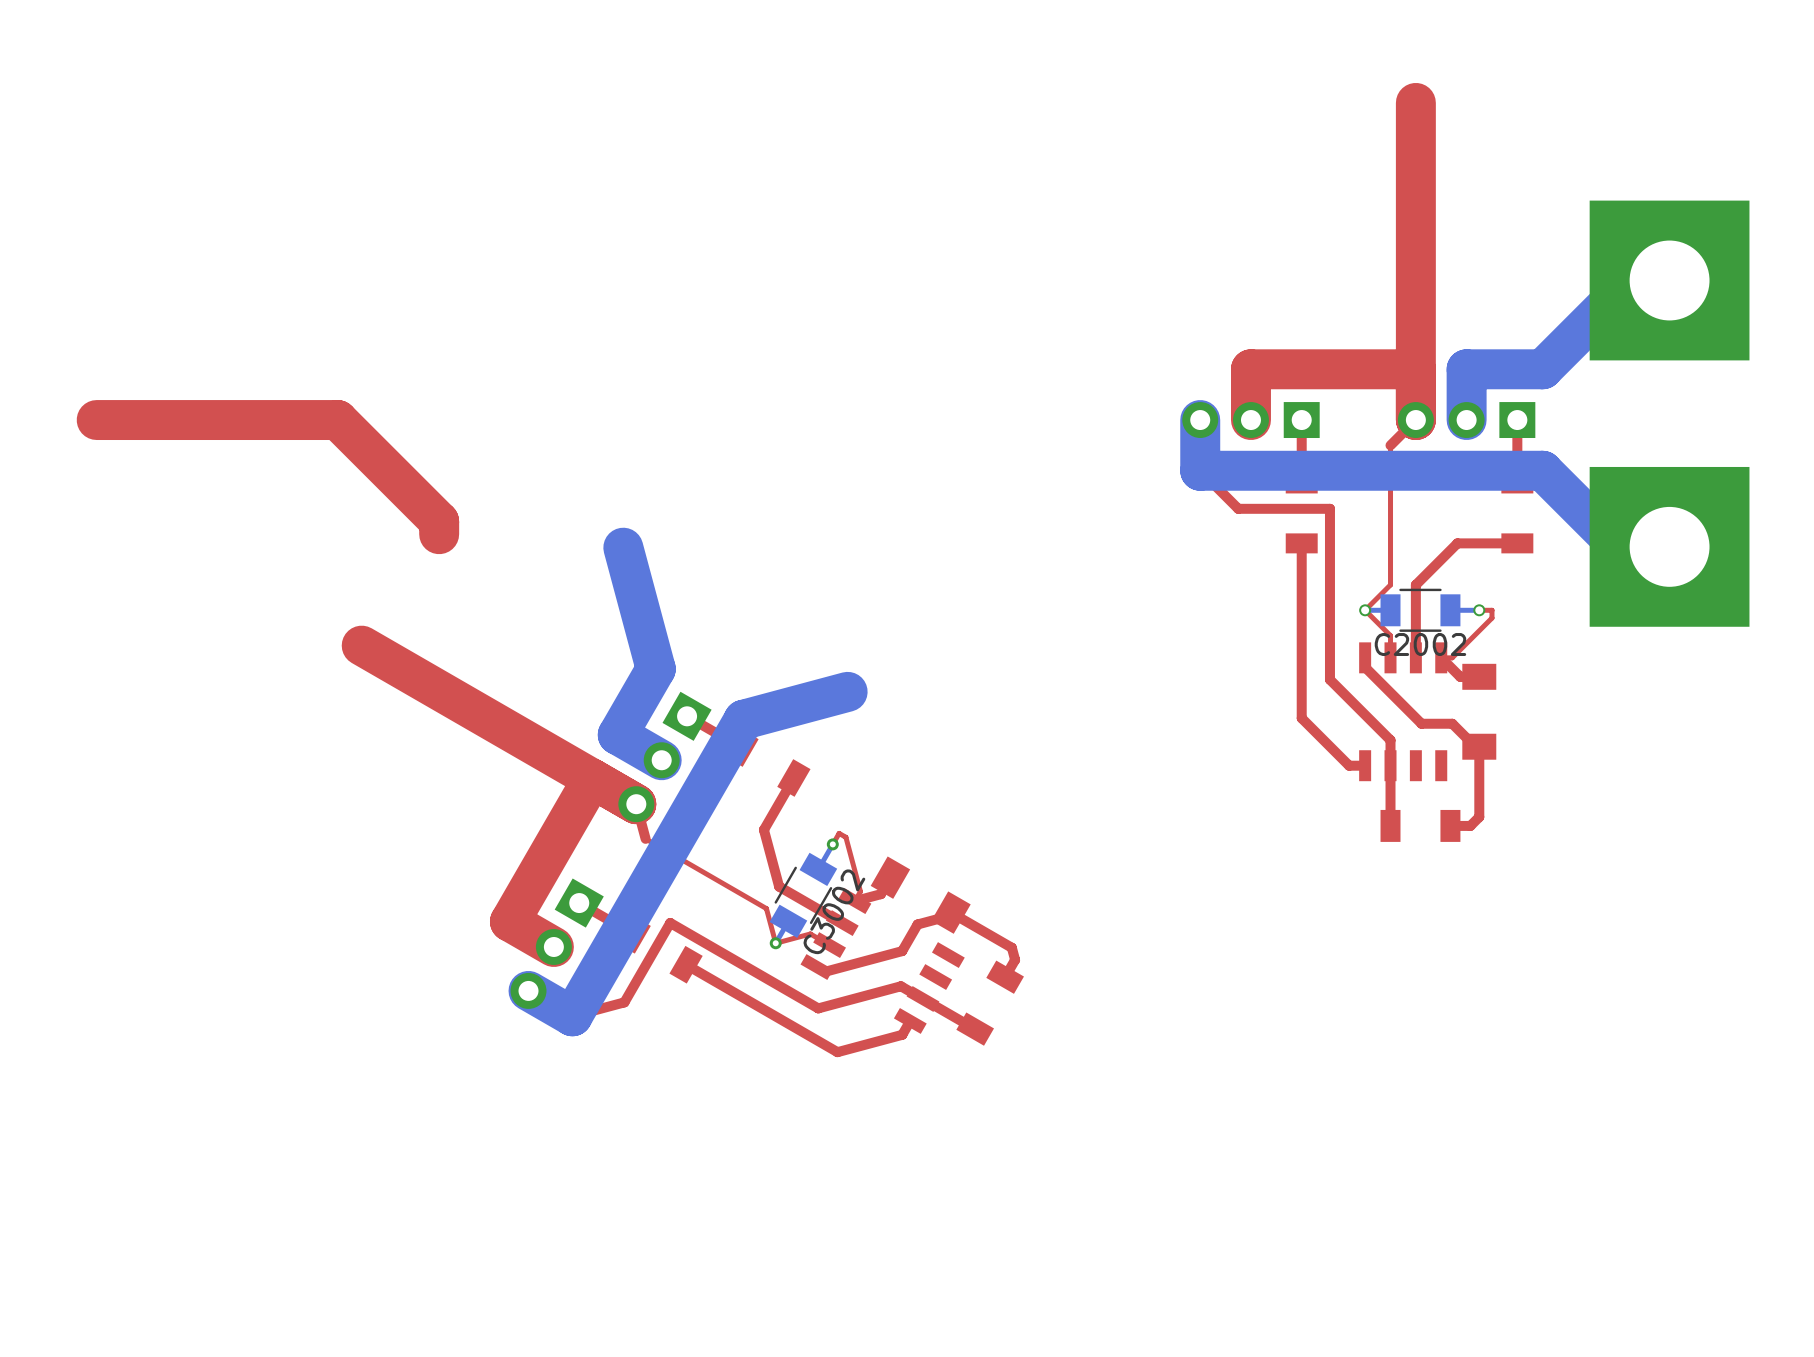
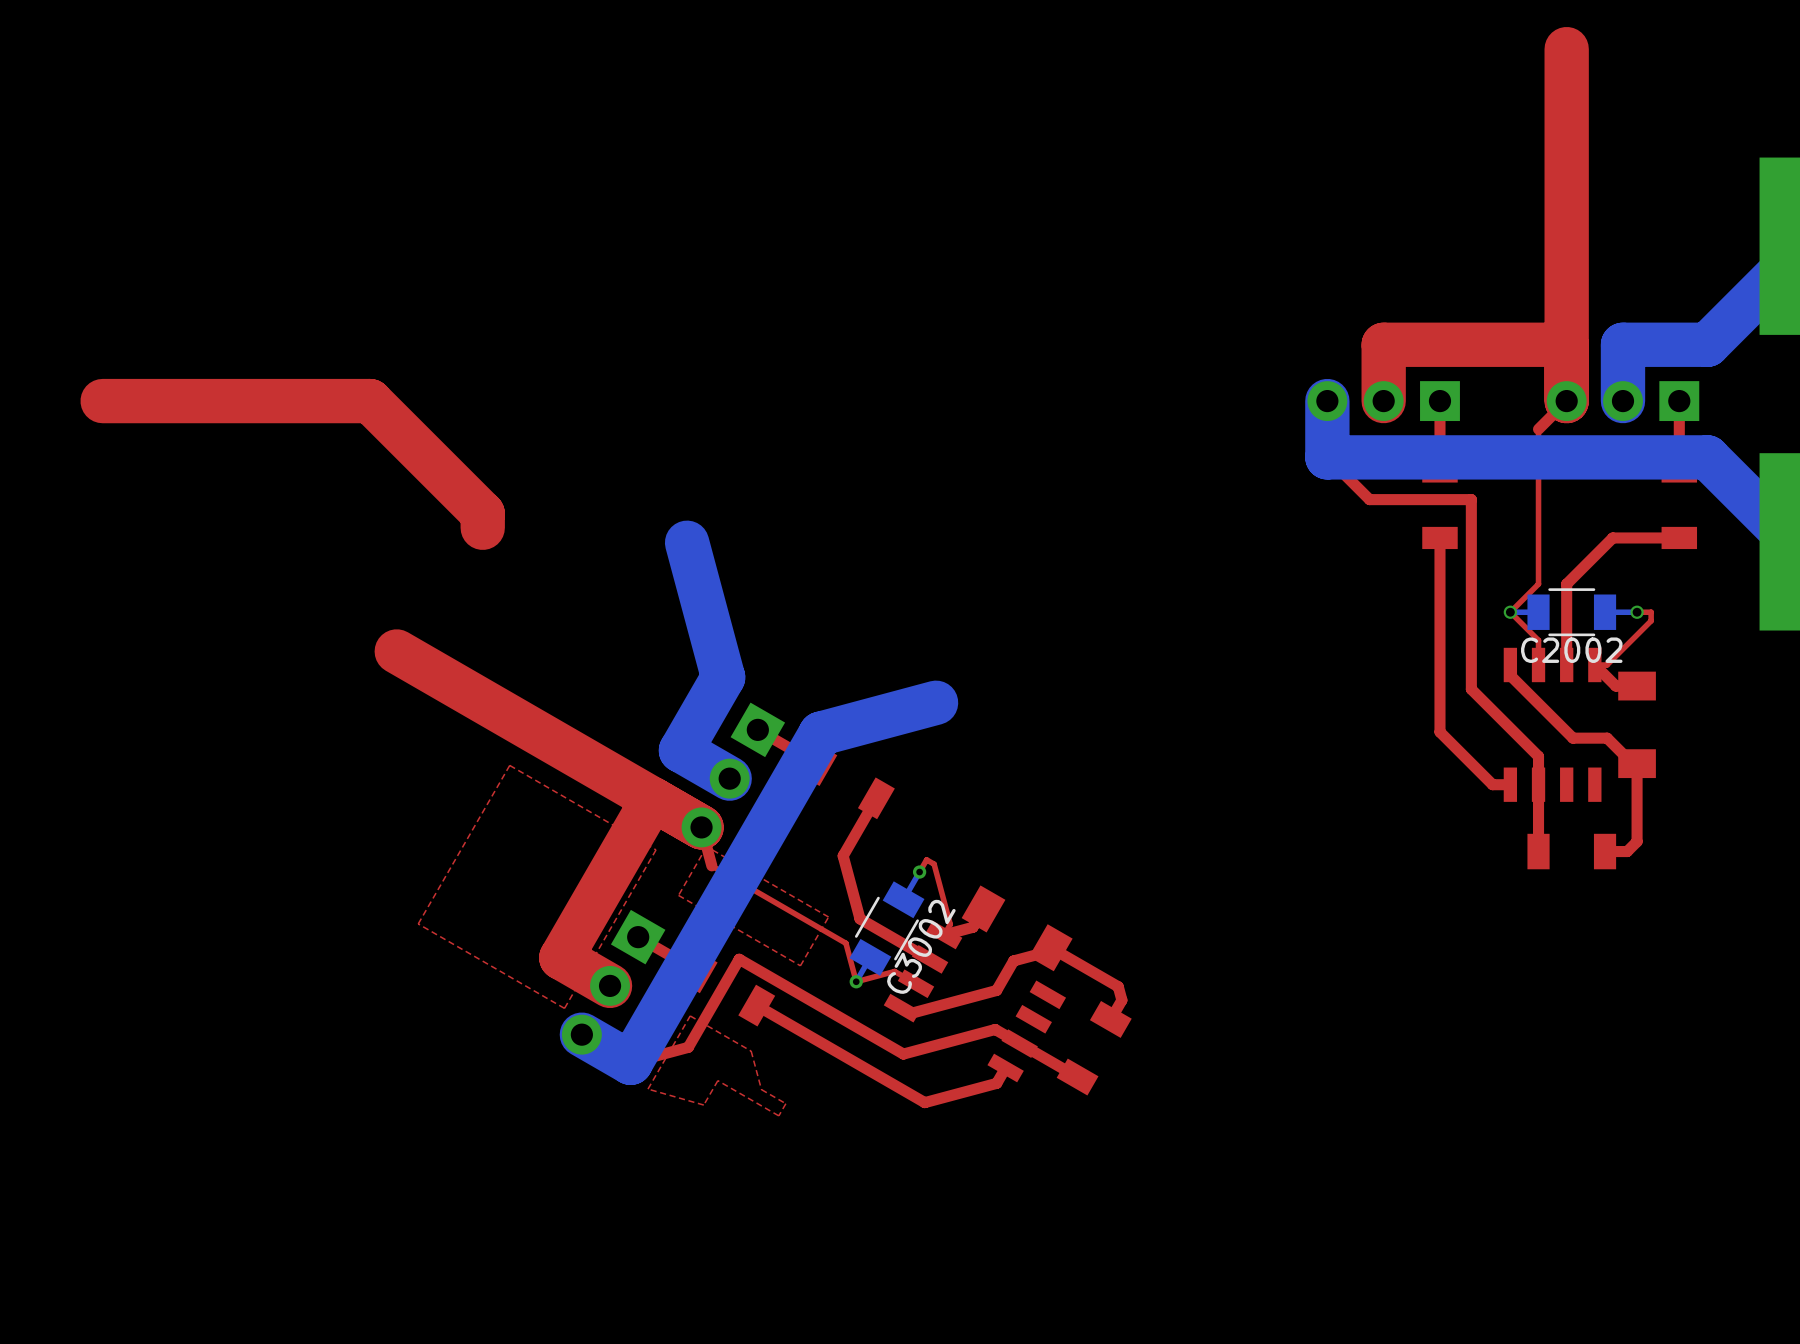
top zone outline: none -> (509, 765) (656, 849) (564, 1008) (418, 923) (509, 765)
top zone outline: none -> (706, 846) (678, 895) (800, 965) (828, 917) (706, 846)
top zone outline: none -> (690, 1015) (751, 1051) (761, 1089) (785, 1103) (778, 1115) (717, 1080) (703, 1105) (647, 1089) (690, 1015)

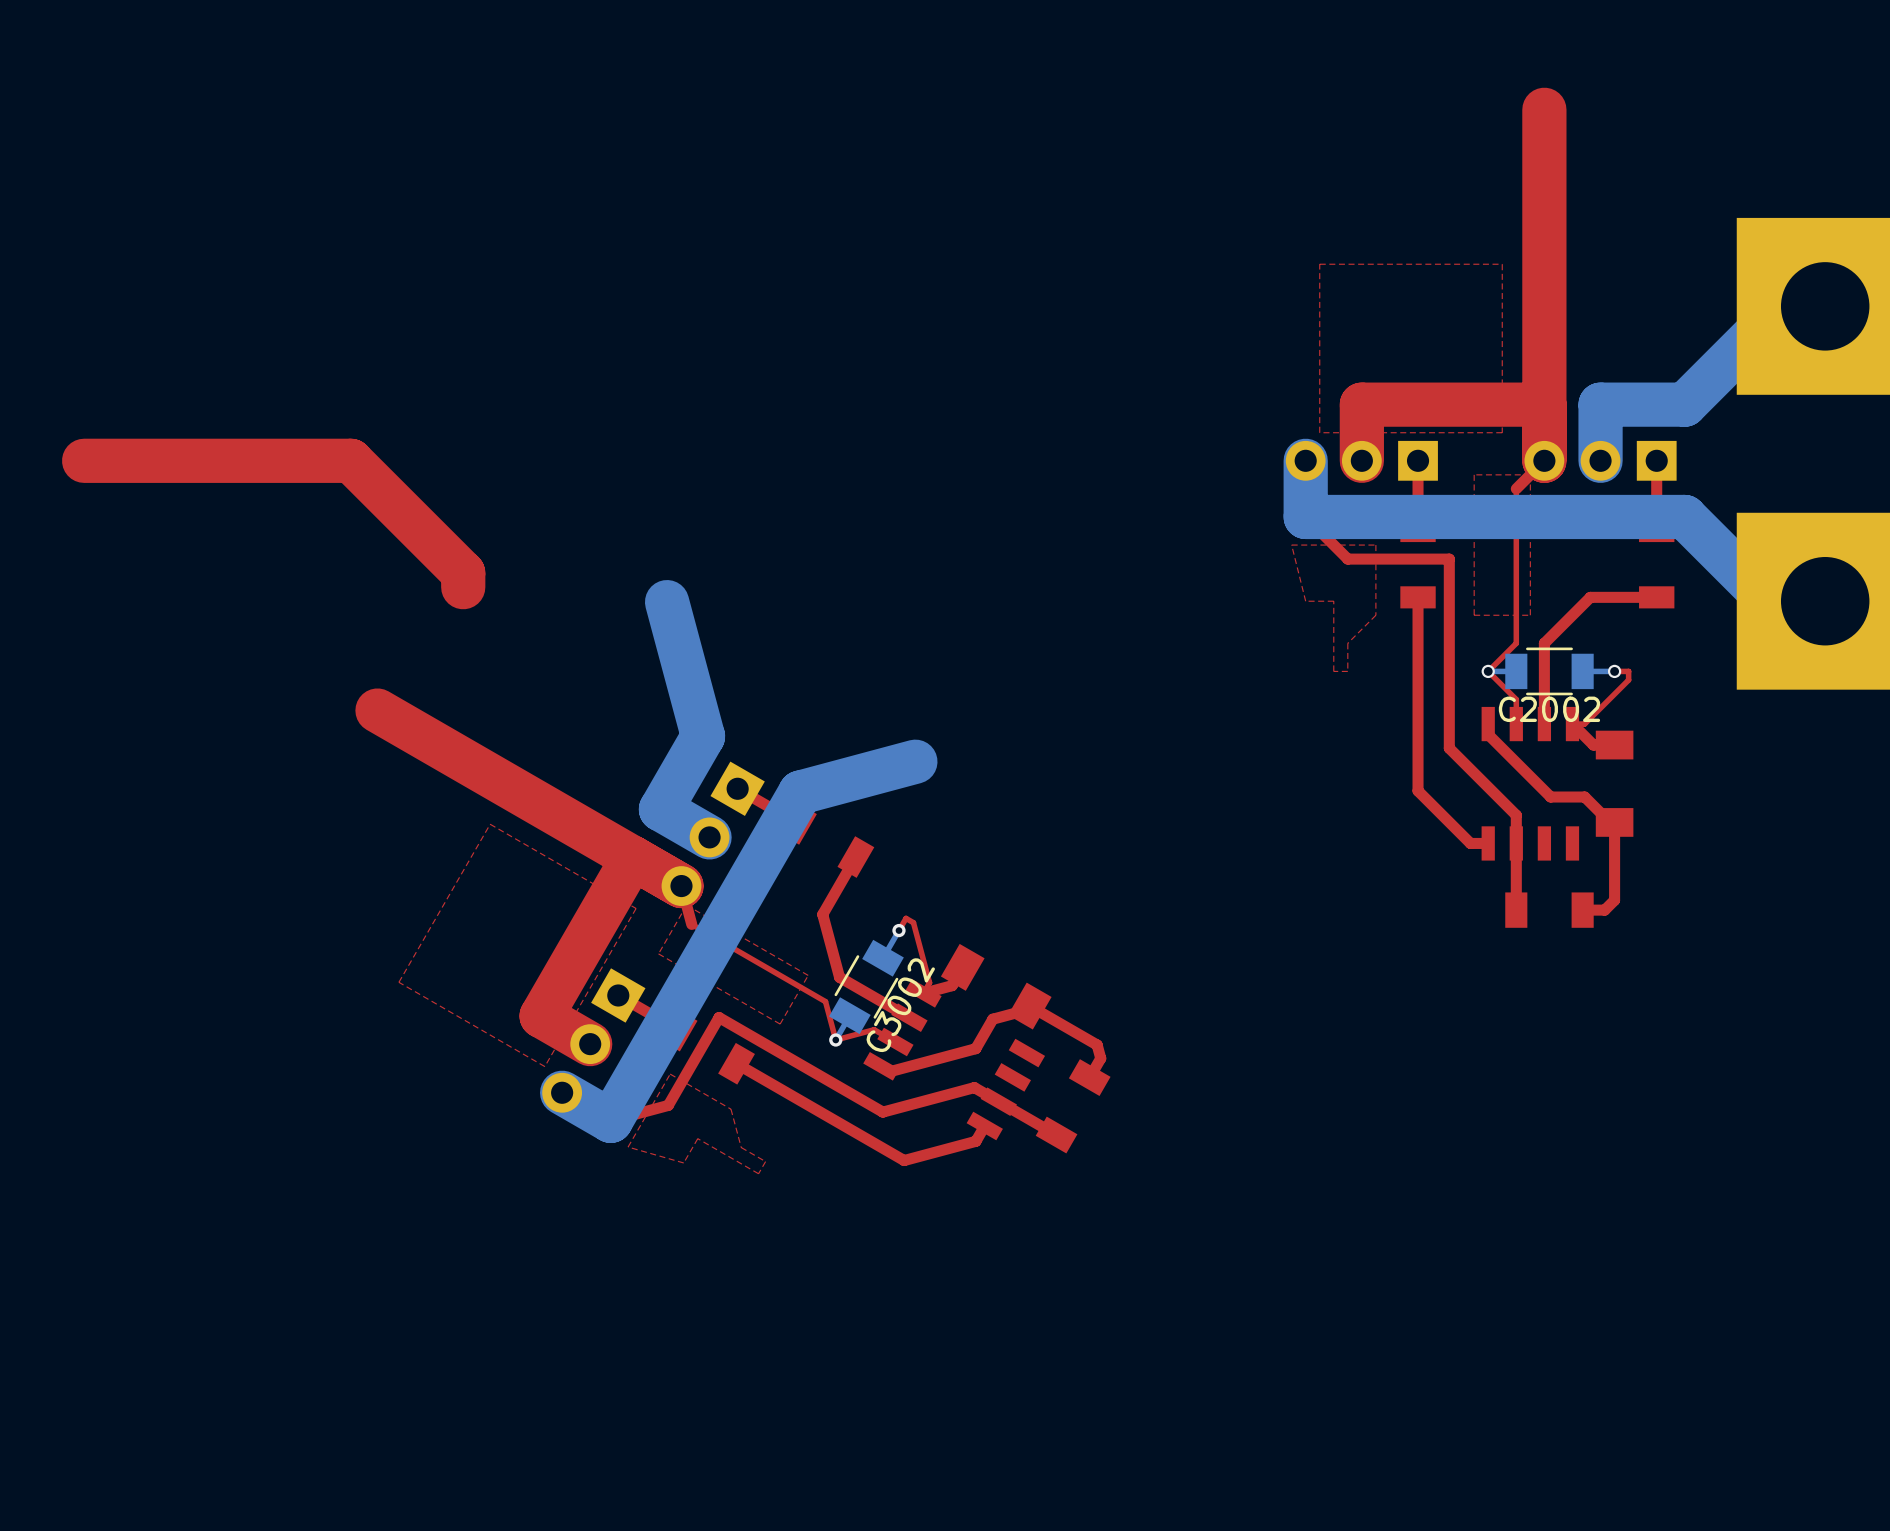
top zone outline: none -> (1502, 264) (1502, 432) (1319, 432) (1319, 264) (1502, 264)
top zone outline: none -> (1530, 474) (1474, 474) (1474, 615) (1530, 615) (1530, 474)
top zone outline: none -> (1375, 545) (1375, 615) (1347, 643) (1347, 671) (1333, 671) (1333, 601) (1305, 601) (1291, 545) (1375, 545)

